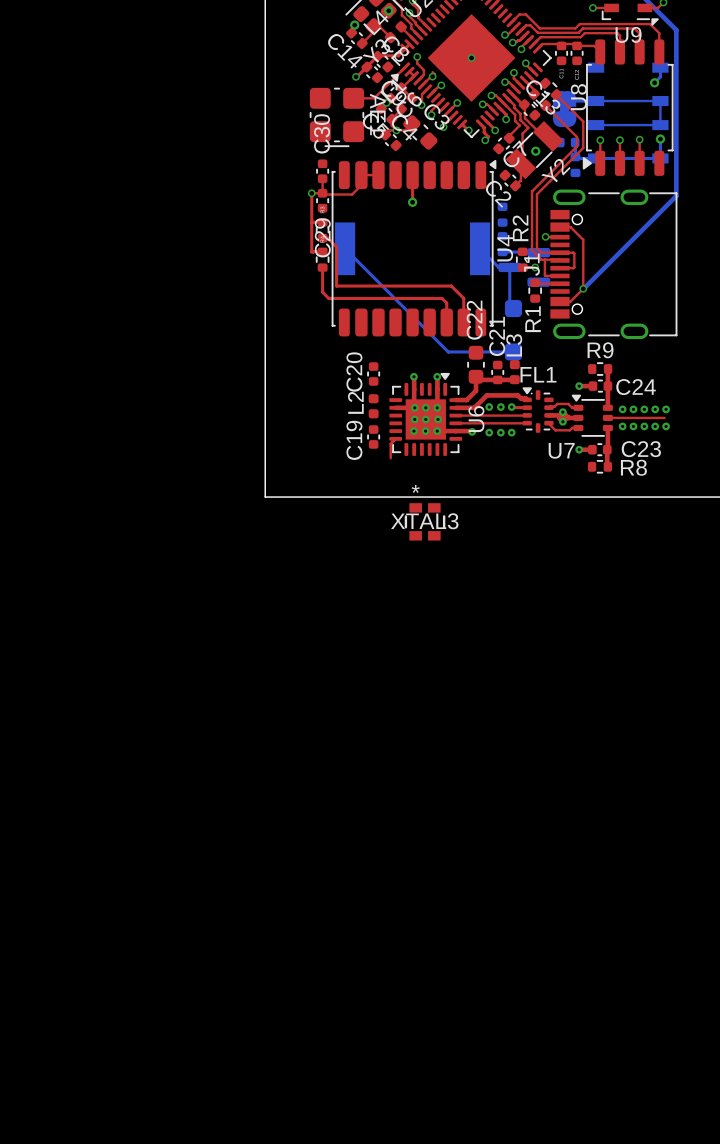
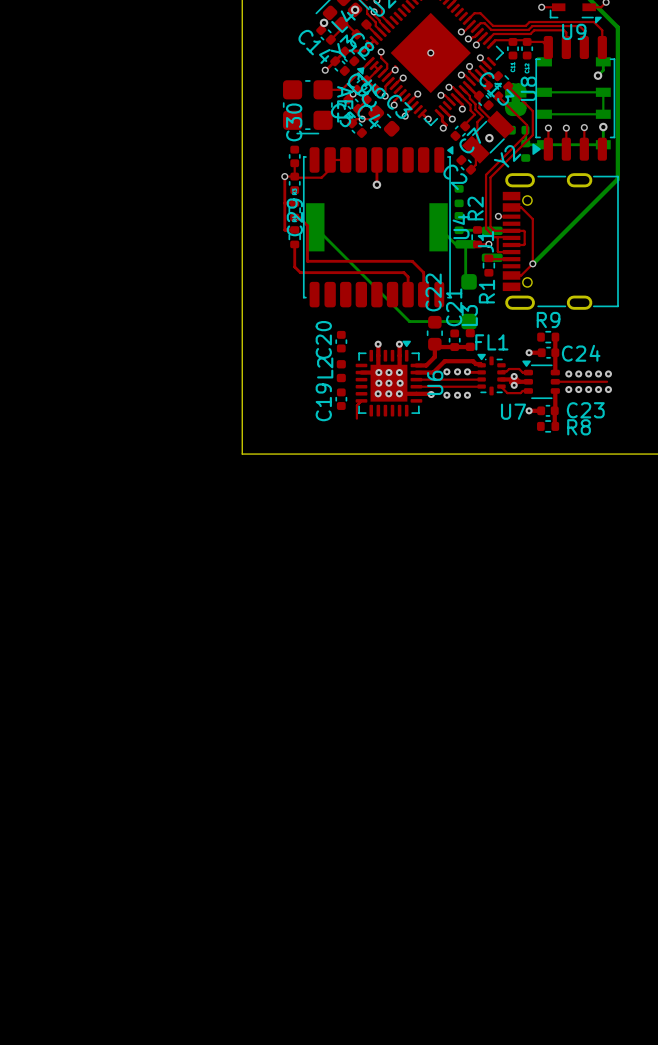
XTAL3: (425, 521) -> none

